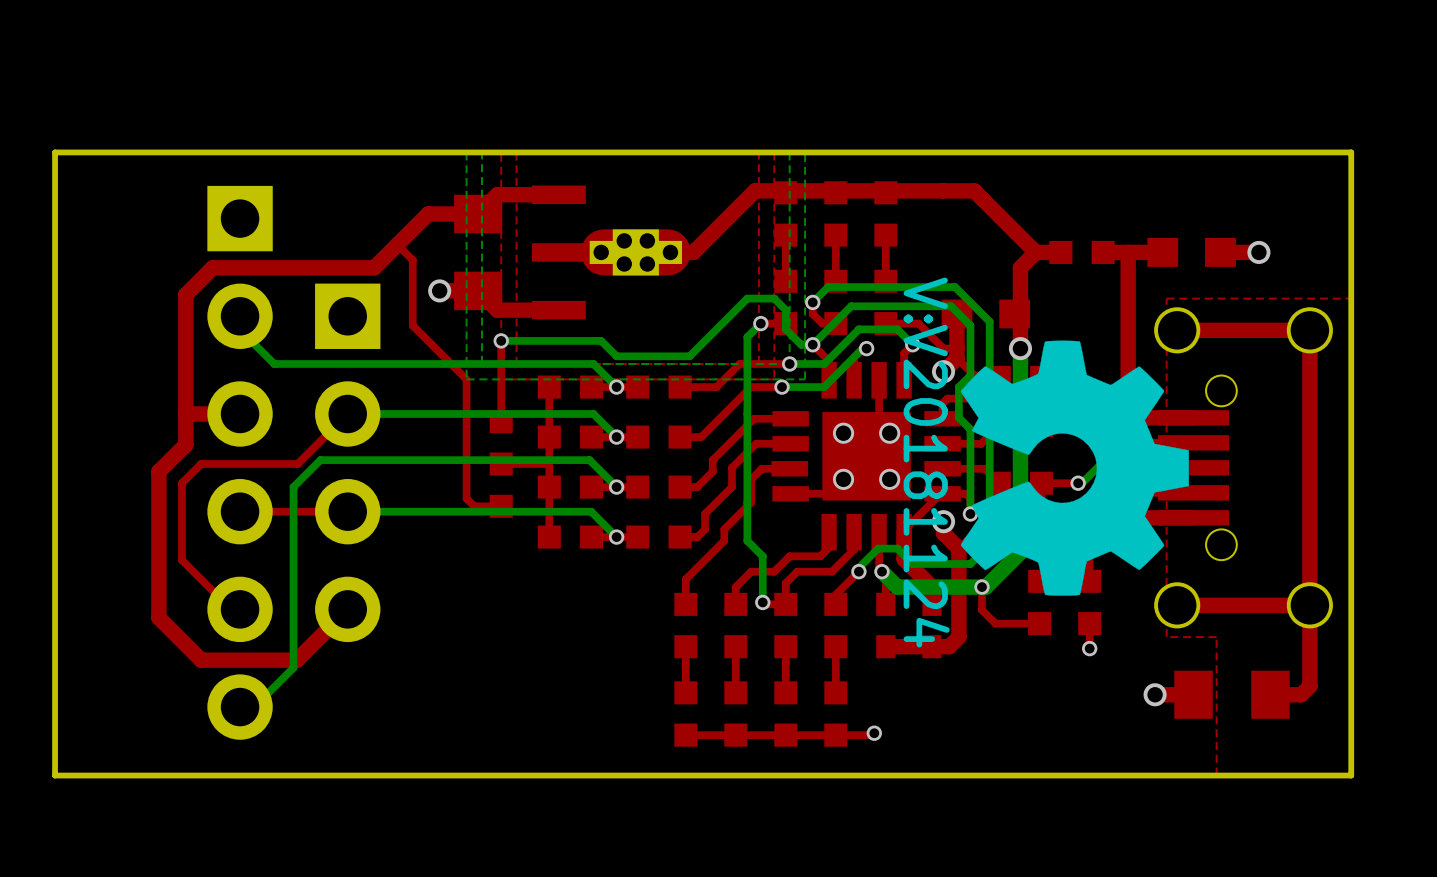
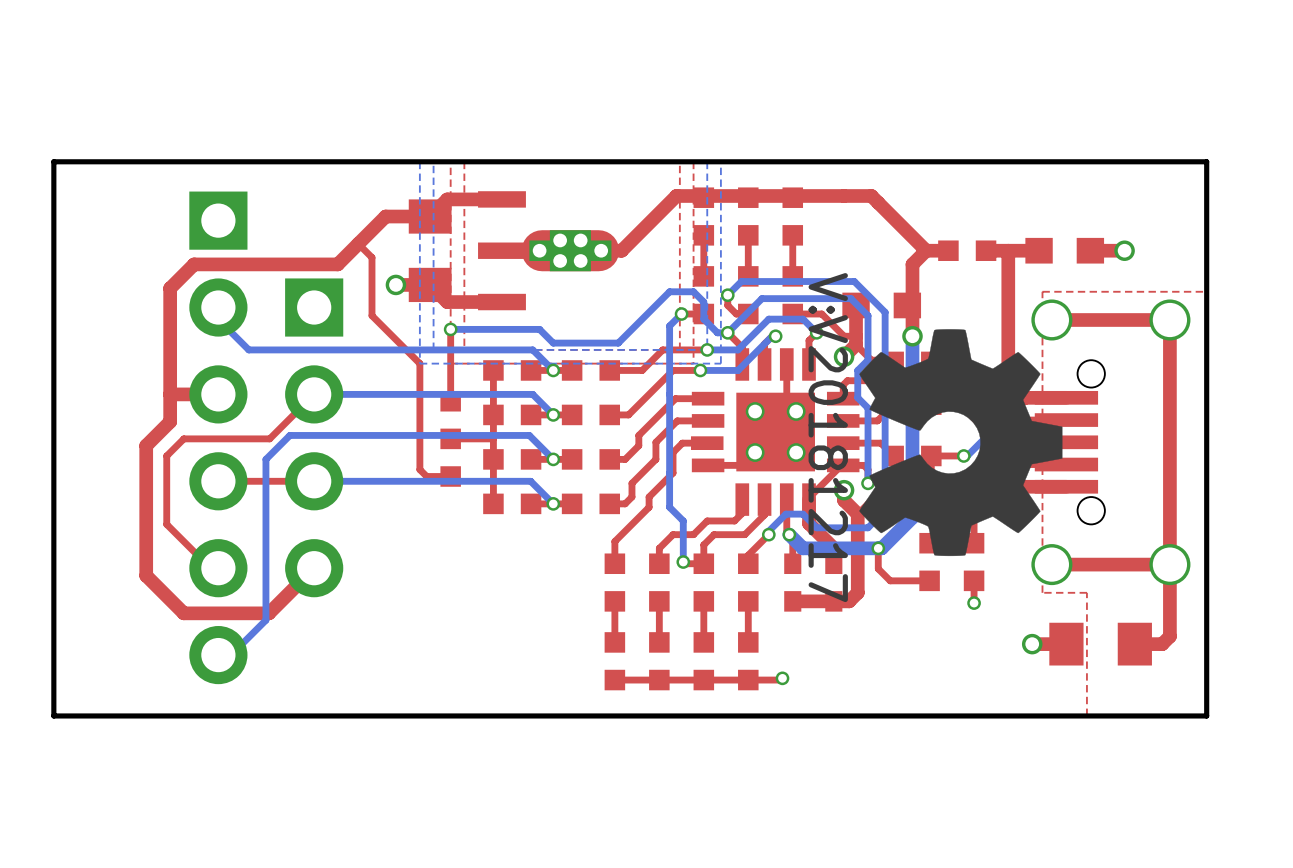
drawing shape: [903, 277, 950, 648] -> [808, 273, 848, 603]

